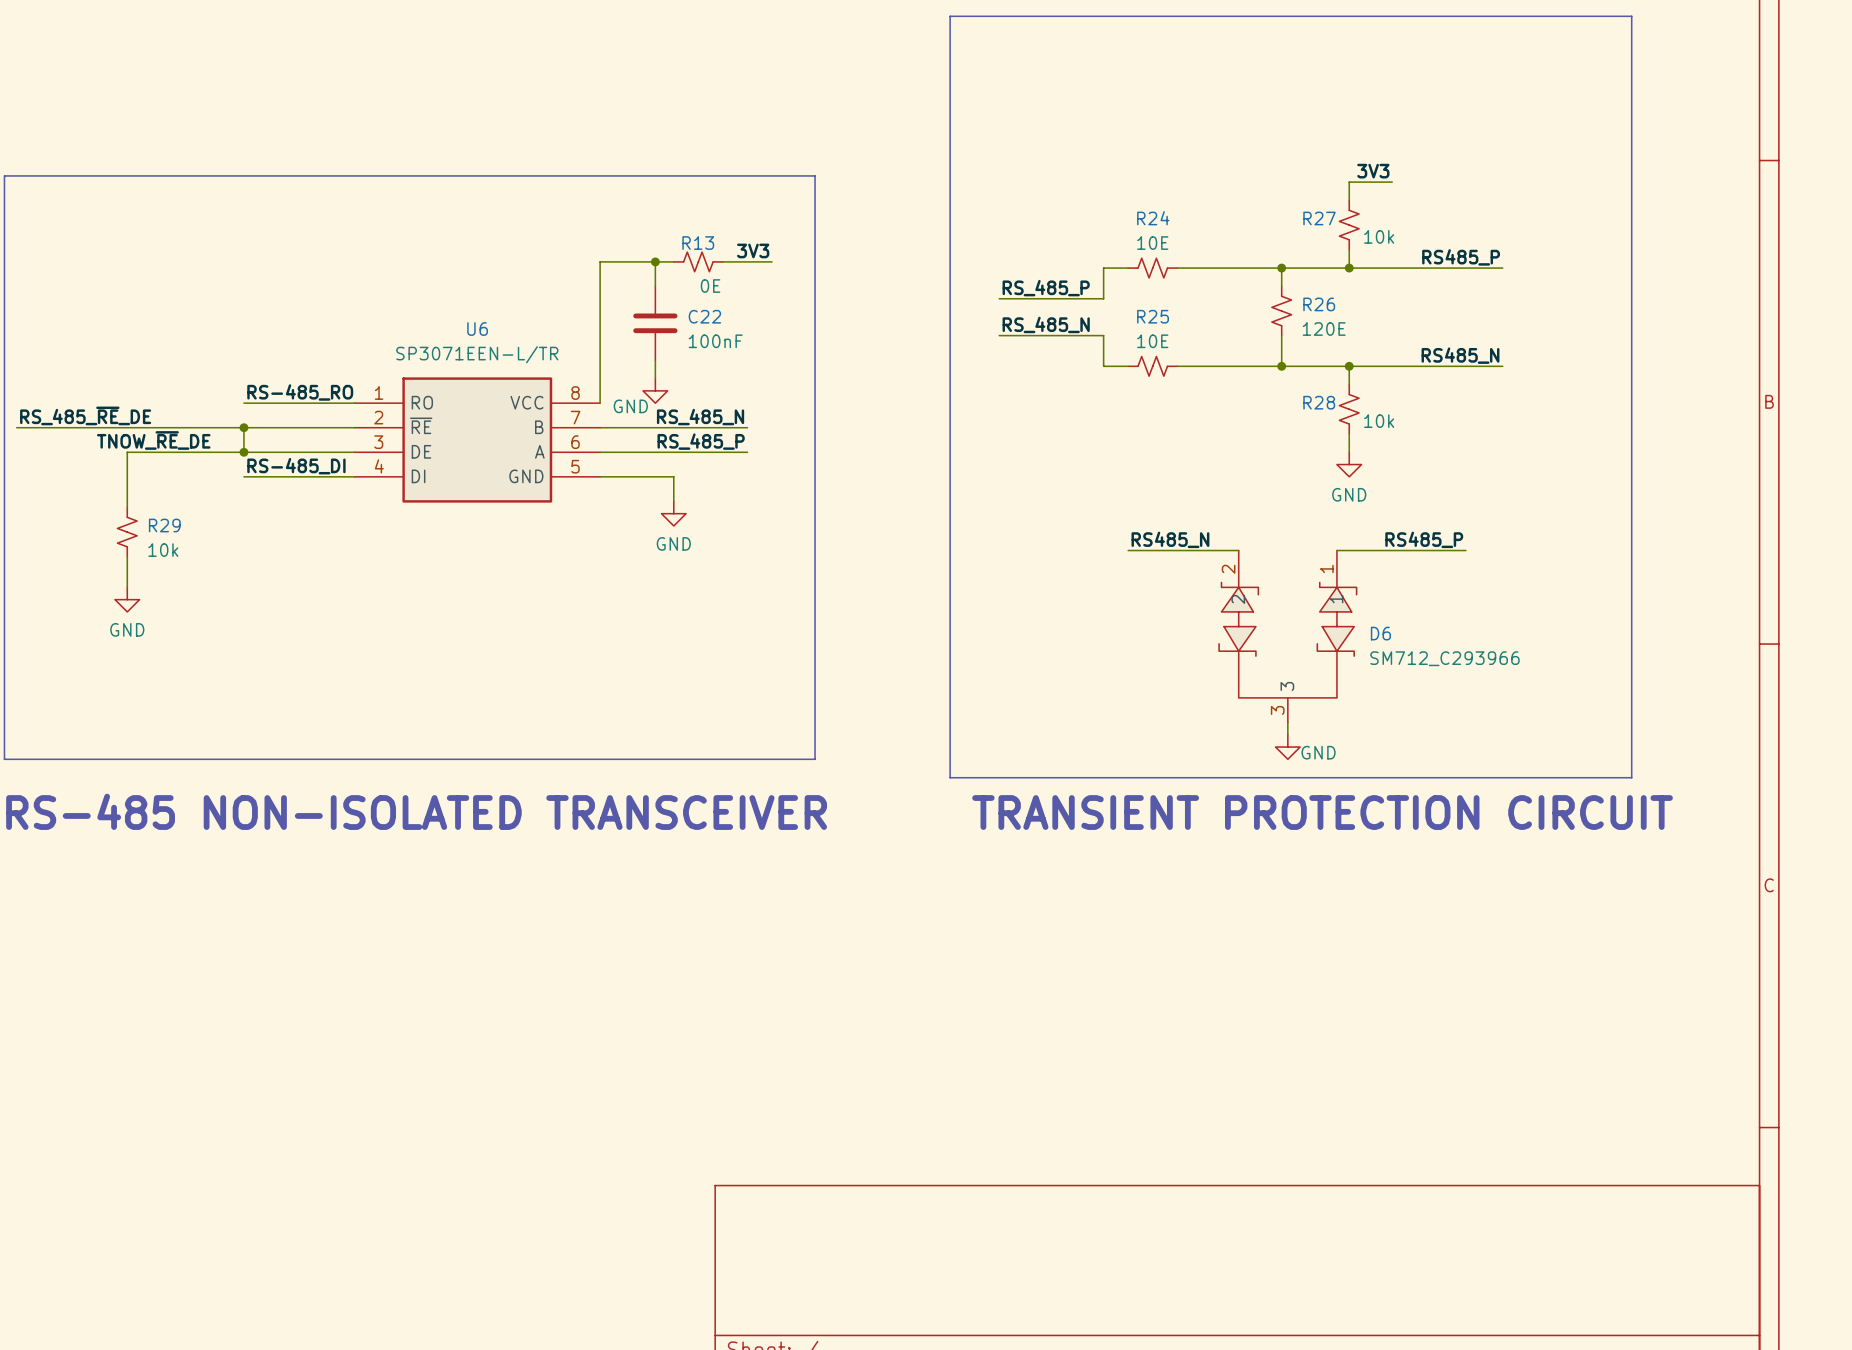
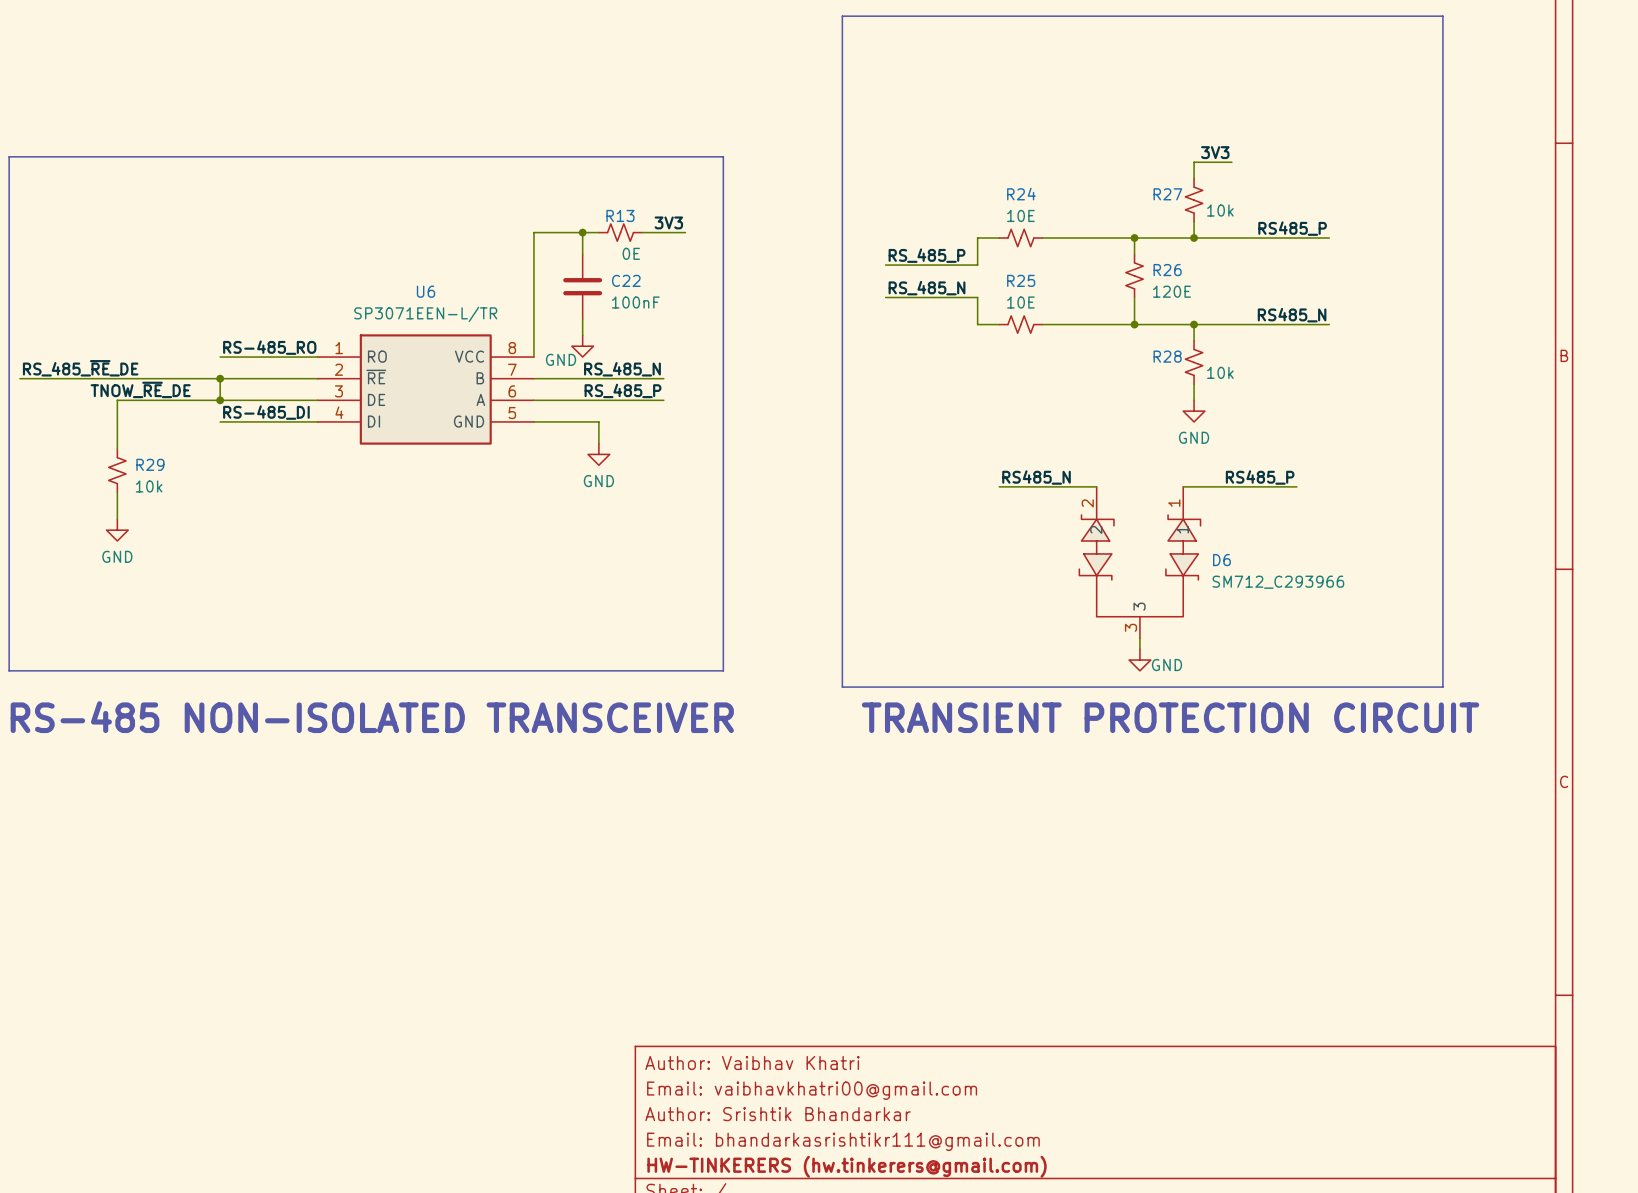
title block: none -> Author: Vaibhav Khatri (752, 1062)
title block: none -> Email: vaibhavkhatri00@gmail.com (812, 1090)
title block: none -> Author: Srishtik Bhandarkar (778, 1114)
title block: none -> Email: bhandarkasrishtikr111@gmail.com (843, 1141)
title block: none -> HW-TINKERERS (hw.tinkerers@gmail.com) (847, 1166)

